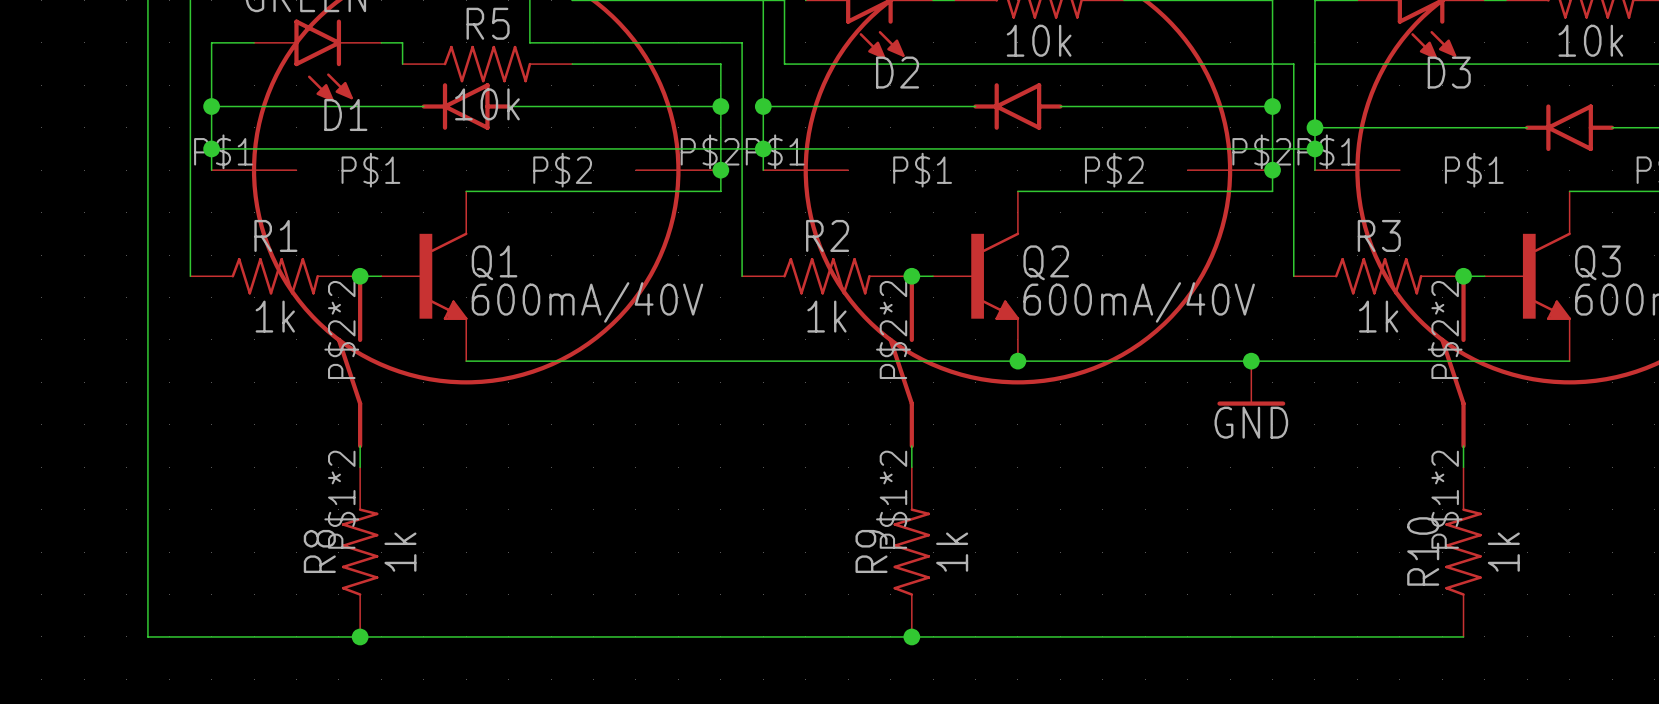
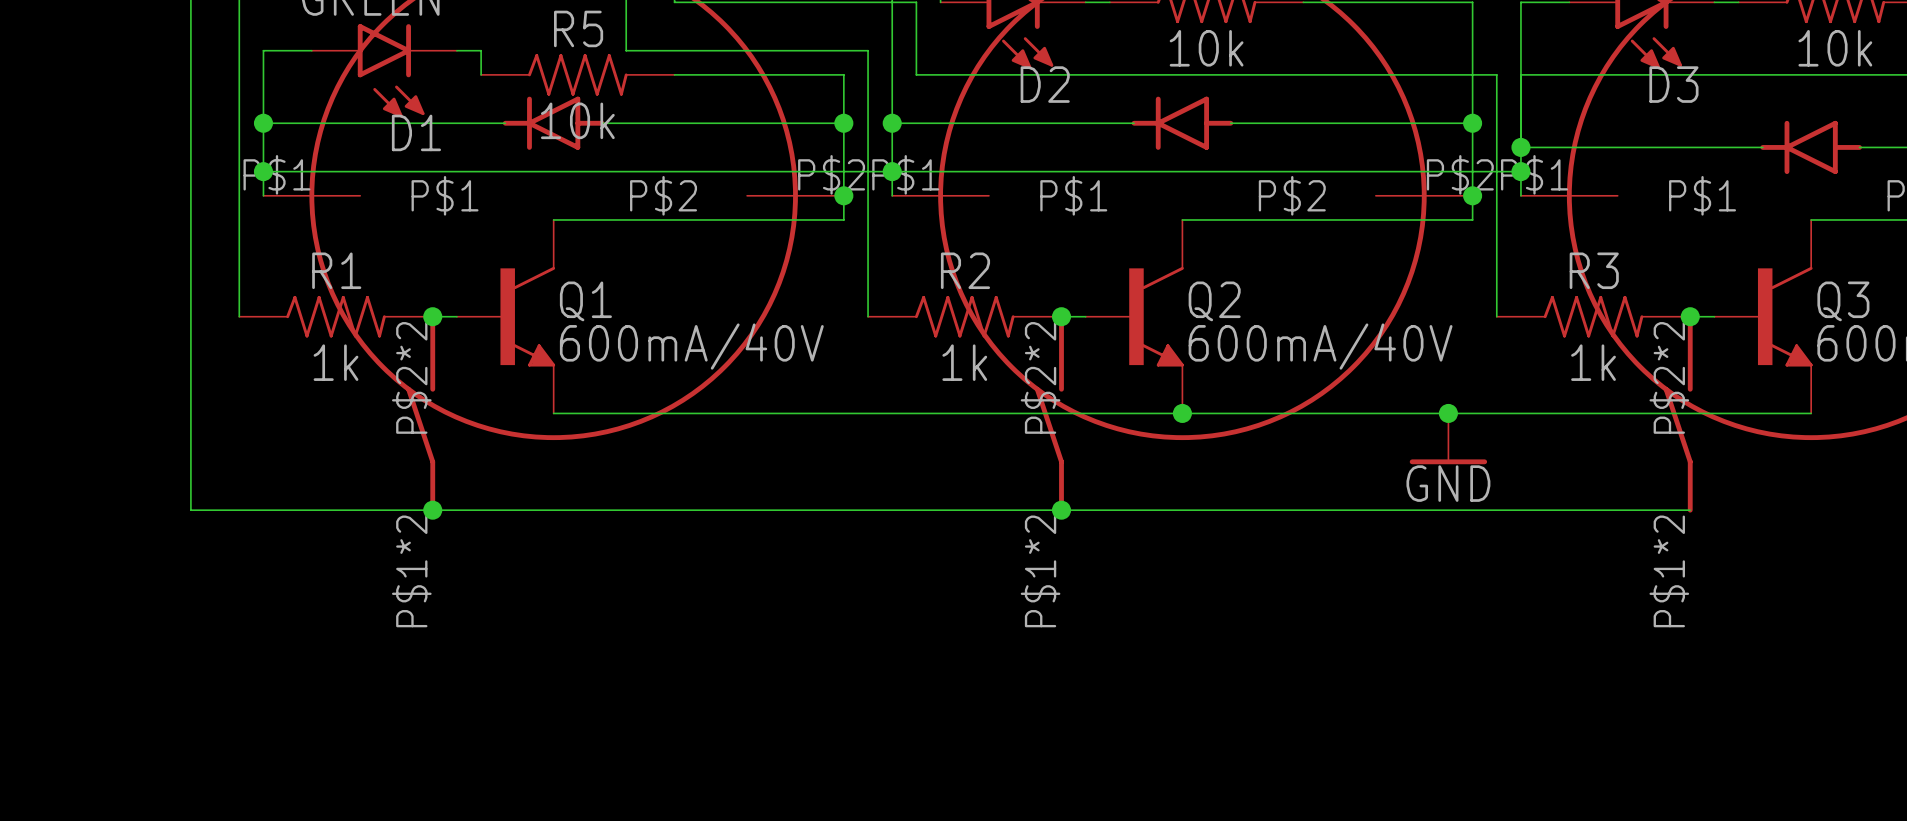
wire: (147, 446) (147, 636) (1463, 636) -> (190, 510) (1690, 510)
wire: (360, 446) (360, 467) -> none
junction: none -> (432, 510)
wire: (911, 446) (911, 467) -> none
junction: none -> (1061, 510)
wire: (1463, 446) (1463, 467) -> none
R8: 1k (360, 552) -> none
R9: 1k (911, 552) -> none
R10: 1k (1463, 552) -> none
junction: (360, 636) -> none
junction: (911, 636) -> none

